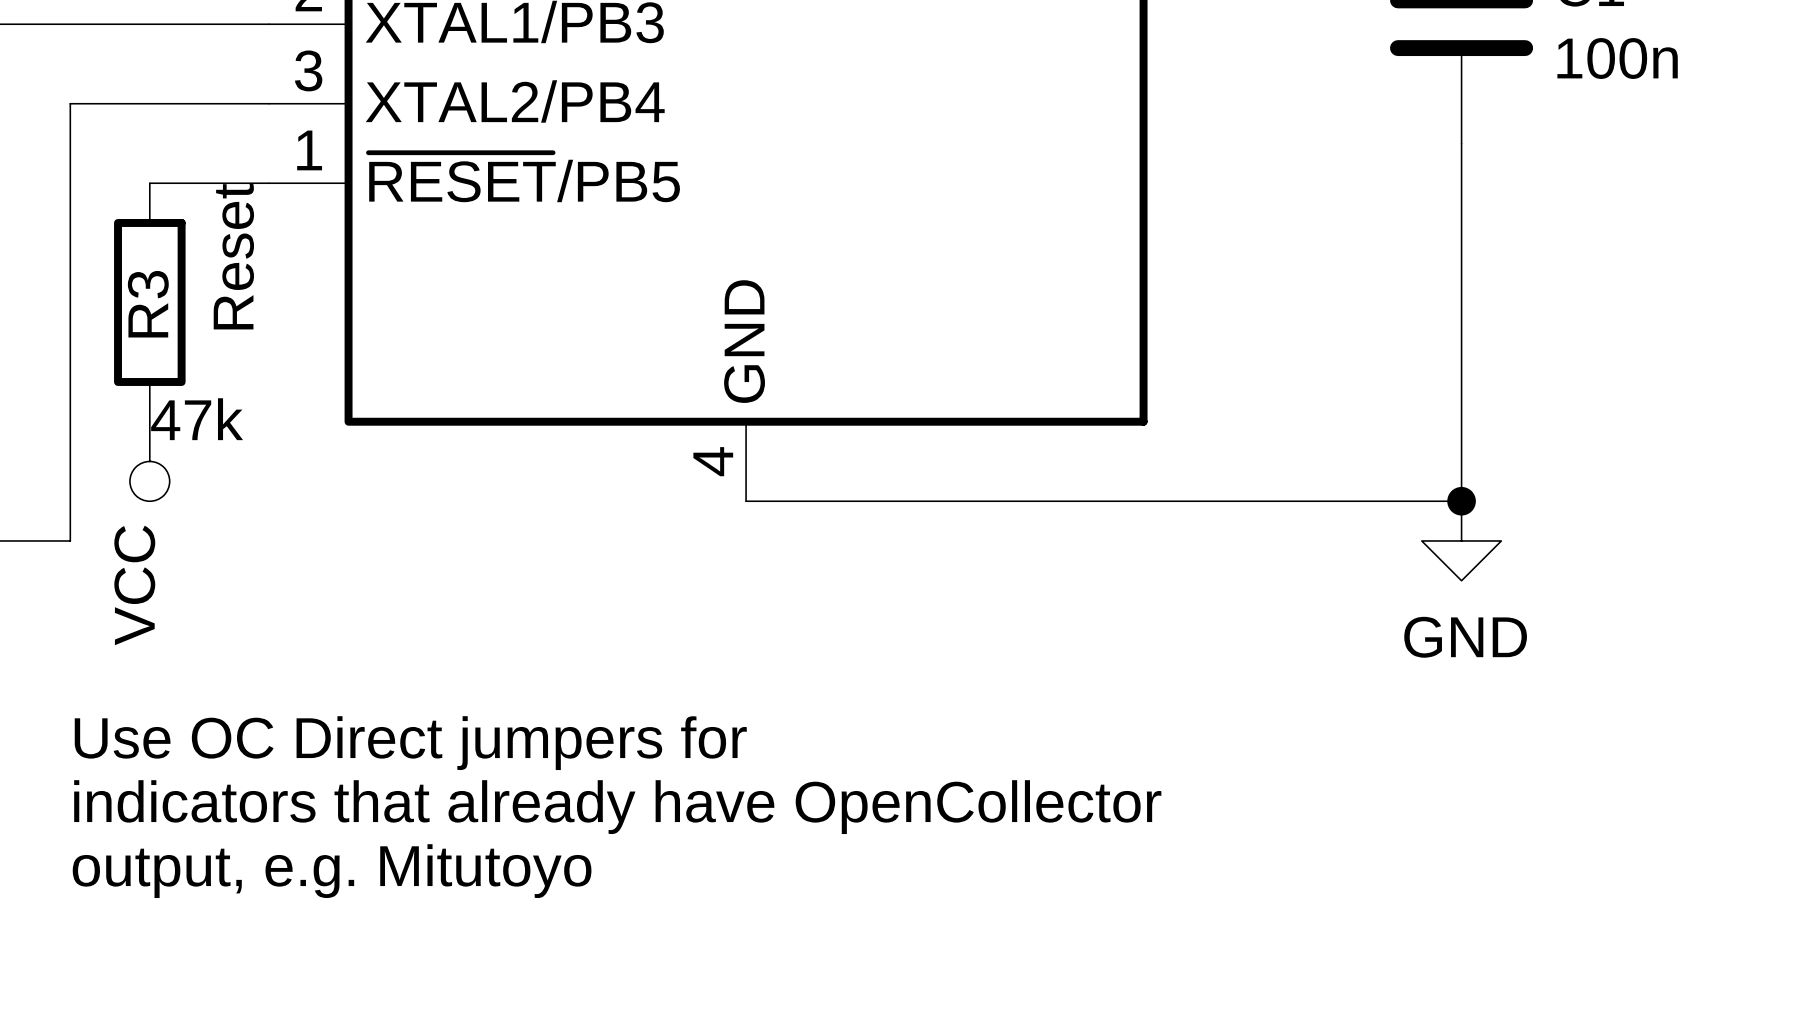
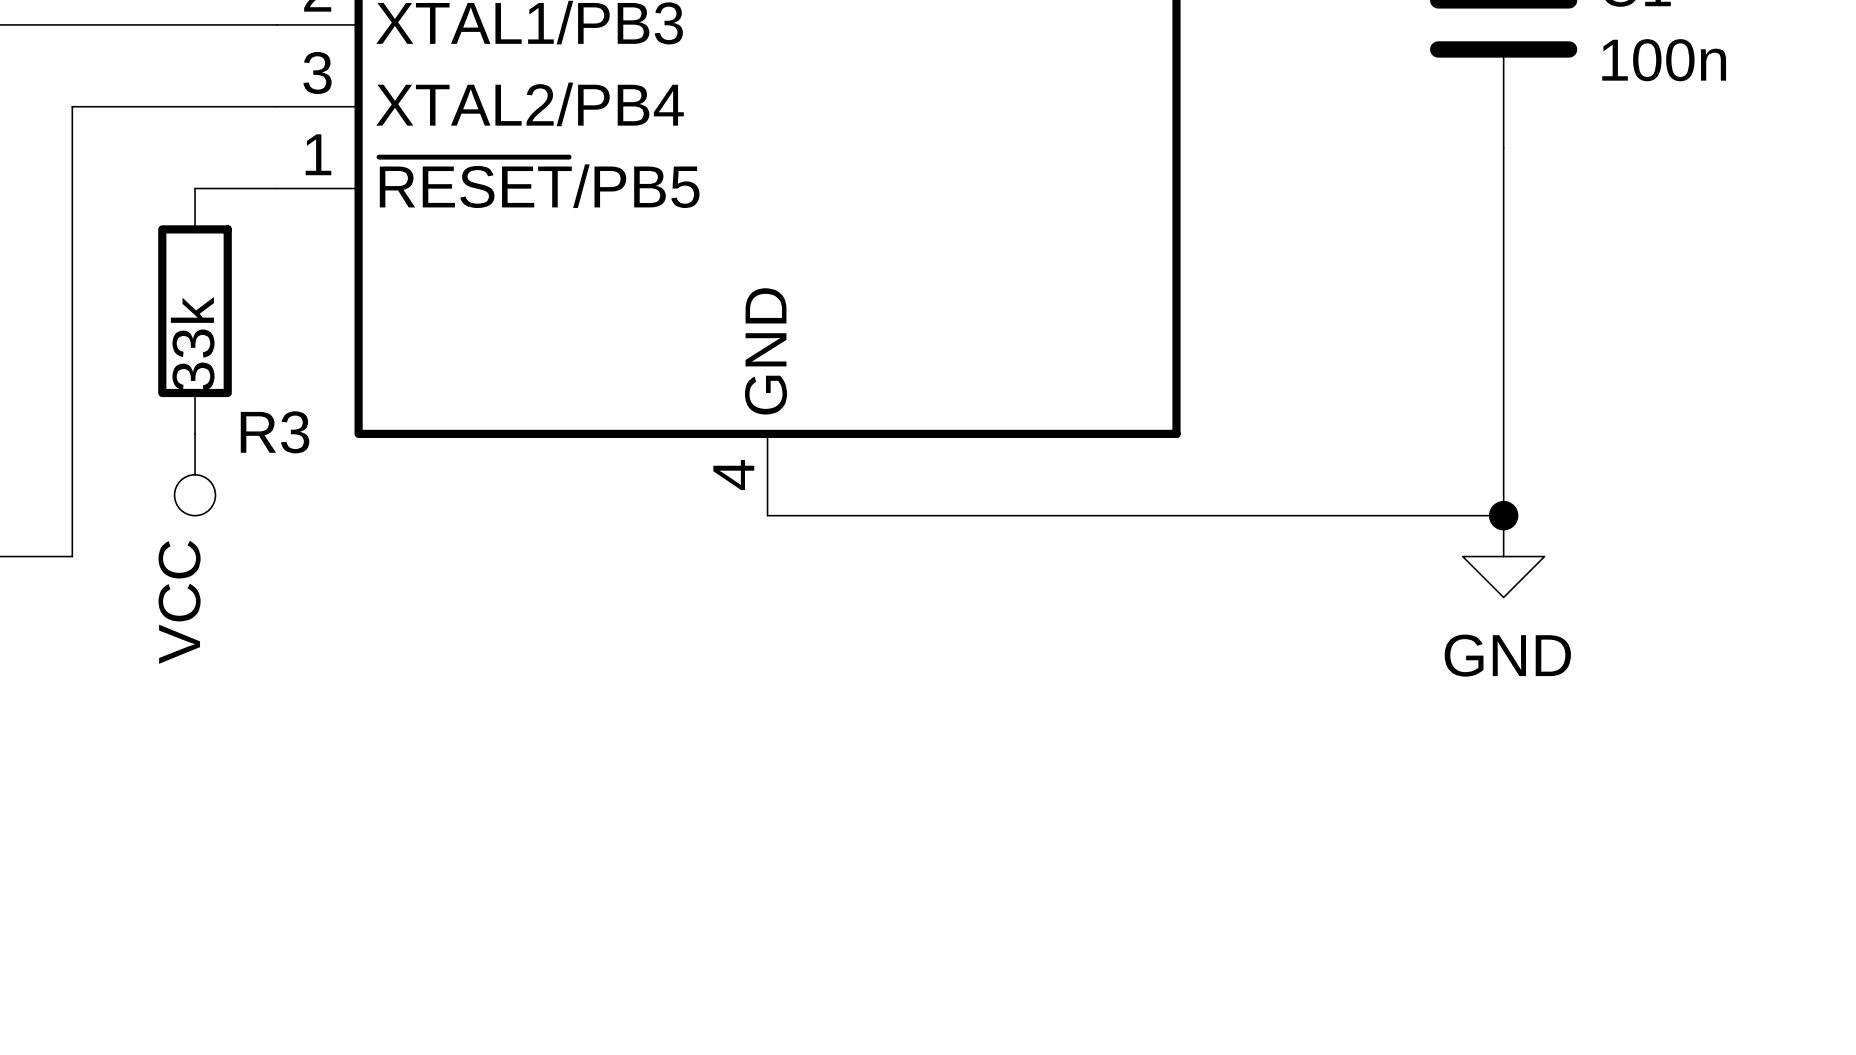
wire: (149, 183) (189, 183) -> none
label: Reset (233, 256) -> none
R3 position: (149, 302) -> (195, 311)
R3 name rotation: 0° (148, 304) -> 90° clockwise (275, 432)
R3 name position: R3 (148, 304) -> R3 (275, 432)
R3 value: 47k (197, 419) -> 33k (192, 343)
power symbol position: VCC (149, 461) -> VCC (195, 474)
text: Use OC Direct jumpers for (410, 743) -> none
text: indicators that already have OpenCollector (617, 807) -> none
text: output, e.g. Mitutoyo (332, 871) -> none

